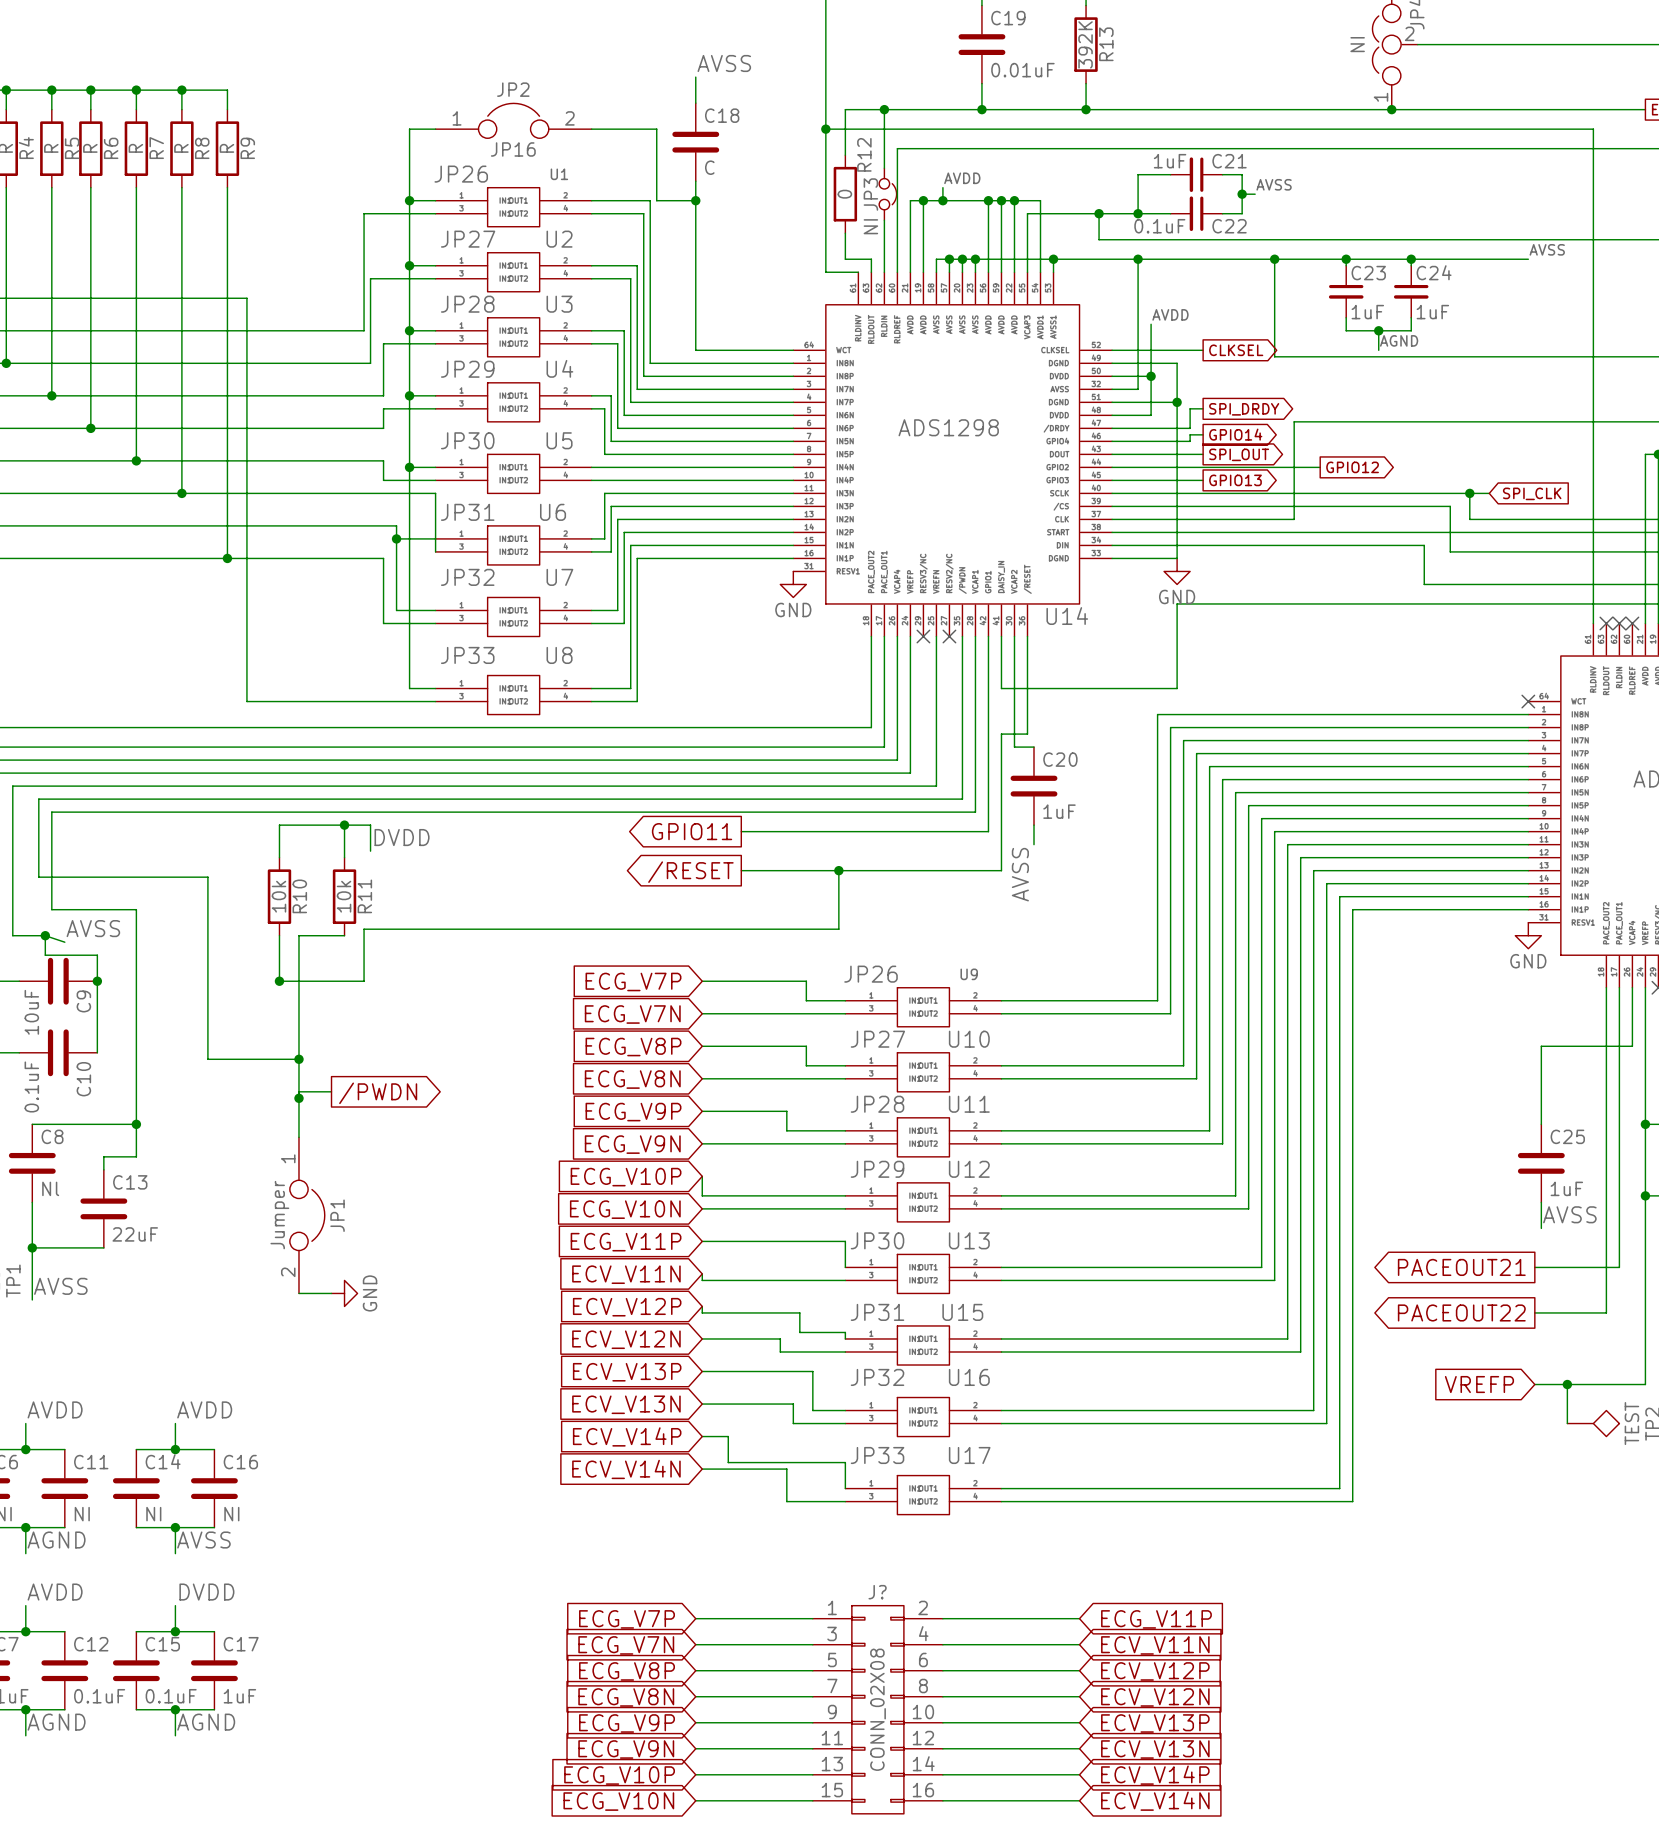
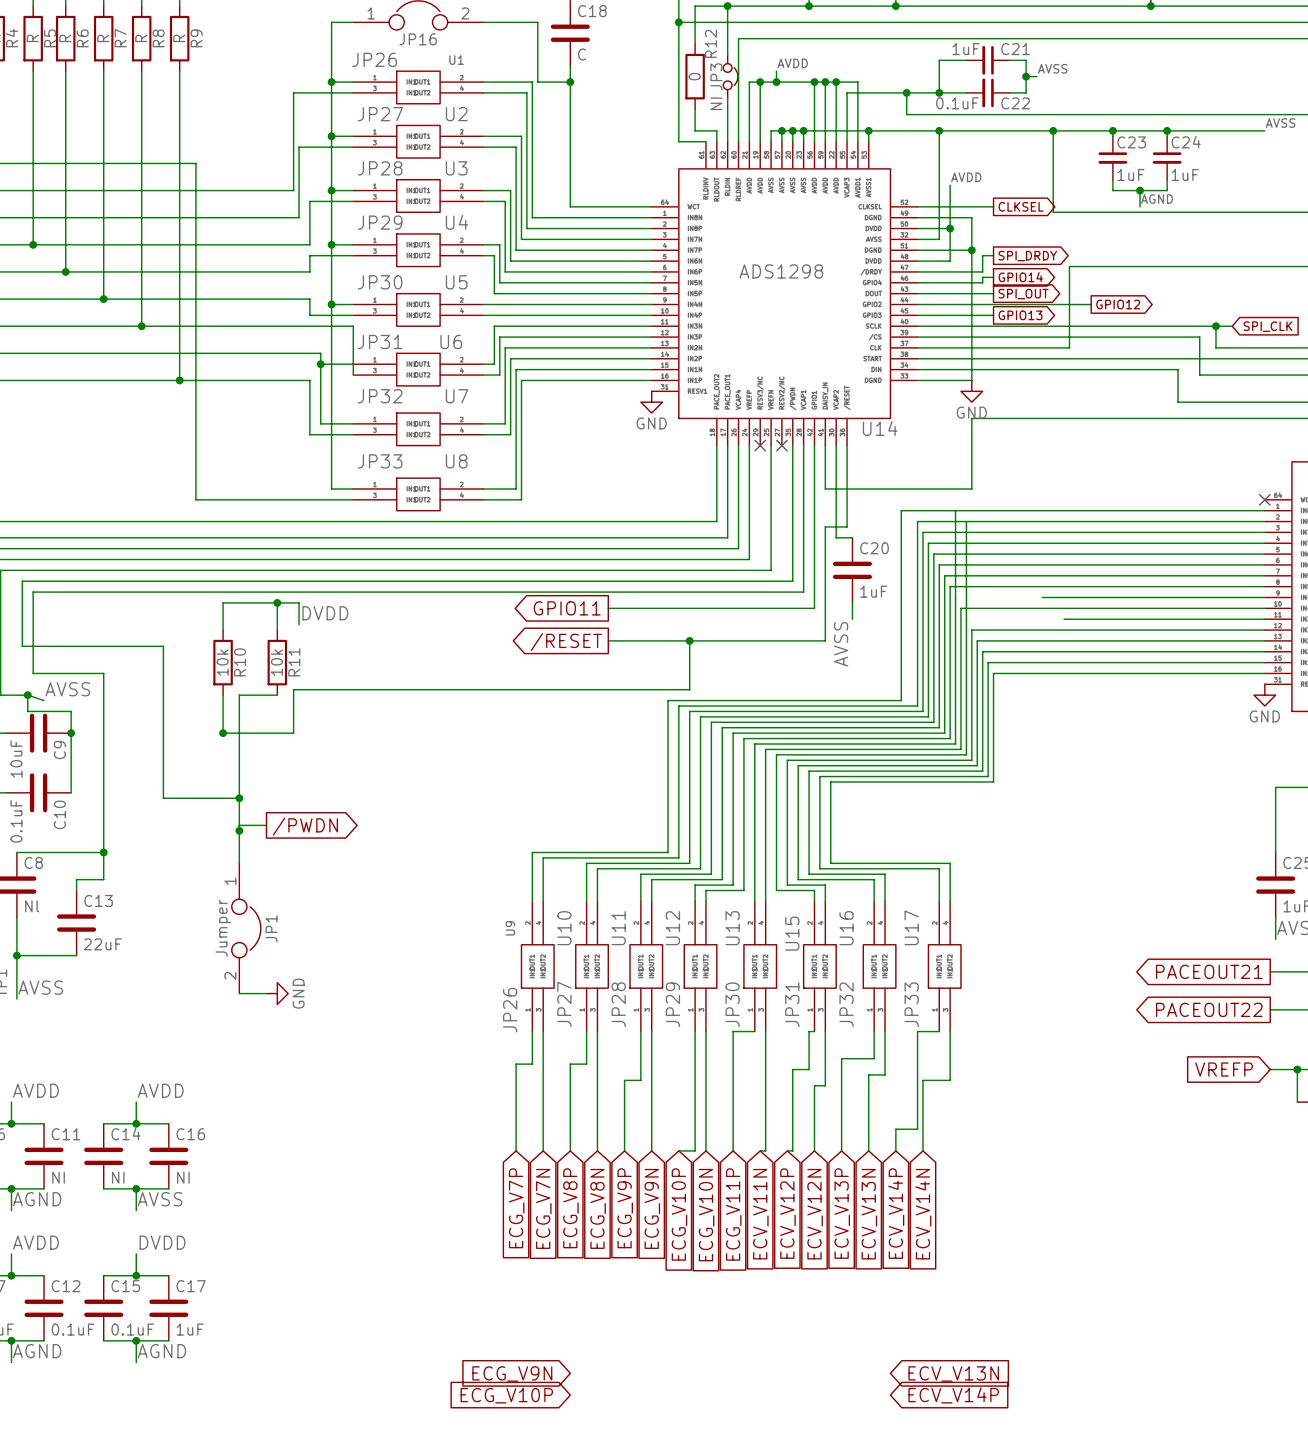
wire: none -> (955, 510) (901, 510) (901, 700) (667, 700) (667, 852) (532, 852) (532, 901)
wire: (1183, 740) (1183, 870) -> (1085, 640) (977, 640)
wire: none -> (977, 532) (922, 532) (922, 711) (689, 711) (689, 863) (586, 863) (586, 901)
wire: (1196, 753) (1196, 896) -> (1107, 662) (988, 662)
wire: none -> (988, 543) (928, 543) (928, 716) (700, 716) (700, 868) (695, 868)
wire: (1209, 766) (1209, 1130) (1001, 1130) -> (998, 554) (933, 554) (933, 722) (711, 722) (711, 874) (640, 874) (640, 901)
wire: (1222, 779) (1222, 1143) (1138, 1143) -> (1009, 564) (939, 564) (939, 727) (722, 727) (722, 879) (651, 879) (651, 901)
wire: (1235, 792) (1235, 1195) (1001, 1195) -> (1020, 575) (944, 575) (944, 733) (733, 733) (733, 885) (695, 885) (695, 901)
wire: (1248, 805) (1248, 1208) (1001, 1208) -> (1031, 586) (950, 586) (950, 738) (743, 738) (743, 890) (705, 890) (705, 901)
wire: (1261, 818) (1261, 1267) (1001, 1267) -> none
wire: (1274, 831) (1274, 1280) (1001, 1280) -> none
wire: (1287, 844) (1287, 1338) (1138, 1338) -> none
wire: (1300, 857) (1300, 1351) (1001, 1351) -> none
wire: (1313, 870) (1313, 1410) (1001, 1410) -> none
wire: (1326, 883) (1326, 1423) (1001, 1423) -> (1096, 651) (982, 651) (982, 771) (809, 771) (809, 874) (885, 874) (885, 901)
wire: (1339, 896) (1339, 1488) (1001, 1488) -> none
wire: (1352, 909) (1352, 1501) (1001, 1501) -> (1118, 673) (993, 673) (993, 781) (830, 781) (830, 863) (950, 863) (950, 901)
global label: ECG_V7P (633, 981) -> none
wire: (702, 981) (806, 981) (806, 1000) (845, 1000) -> none
wire: (1157, 994) (1157, 1000) -> (1053, 608) (960, 608) (960, 749) (955, 749)
wire: none -> (955, 744) (754, 744) (754, 901)
wire: none -> (825, 749) (765, 749) (765, 901)
U9 rotation: 0° (923, 1007) -> 90° counterclockwise (537, 966)
U9 position: (923, 1007) -> (537, 966)
wire: (1170, 1007) (1170, 1013) -> (1074, 630) (971, 630) (971, 760) (966, 760)
wire: none -> (966, 754) (776, 754) (776, 890) (814, 890) (814, 901)
wire: (702, 1013) (845, 1013) -> none
wire: none -> (825, 760) (787, 760) (787, 885) (825, 885) (825, 901)
global label: ECG_V7N (632, 1014) -> none
wire: (1183, 1020) (1183, 1065) (1001, 1065) -> (977, 765) (798, 765) (798, 879) (874, 879) (874, 901)
wire: (1196, 1033) (1196, 1078) (1001, 1078) -> (988, 776) (819, 776) (819, 868) (825, 868)
wire: (702, 1046) (806, 1046) (806, 1065) (845, 1065) -> none
global label: ECG_V8P (633, 1047) -> none
U10 rotation: 0° (923, 1072) -> 90° counterclockwise (592, 966)
U10 position: (923, 1072) -> (592, 966)
wire: (702, 1078) (845, 1078) -> none
global label: ECG_V8N (632, 1079) -> none
wire: (702, 1111) (786, 1111) (786, 1130) -> (543, 901) (543, 857) (646, 857)
global label: ECG_V9P (633, 1112) -> none
wire: (825, 1130) (845, 1130) -> (678, 857) (678, 706) (917, 706) (917, 521) (966, 521)
U11 rotation: 0° (923, 1137) -> 90° counterclockwise (646, 966)
U11 position: (923, 1137) -> (646, 966)
wire: (702, 1143) (728, 1143) -> (597, 901) (597, 868)
wire: none -> (939, 868) (939, 901)
global label: ECG_V9N (632, 1144) -> none
wire: (702, 1176) (702, 1195) (845, 1195) -> none
global label: ECG_V10P (626, 1177) -> none
U12 rotation: 0° (923, 1202) -> 90° counterclockwise (700, 966)
wire: (702, 1208) (845, 1208) -> none
global label: ECG_V10N (625, 1209) -> none
wire: (702, 1241) (845, 1241) (845, 1267) -> none
global label: ECG_V11P (626, 1242) -> none
wire: (702, 1273) (702, 1280) (845, 1280) -> none
U13 rotation: 0° (923, 1273) -> 90° counterclockwise (760, 966)
global label: ECV_V11N (626, 1274) -> none
wire: (702, 1306) (702, 1312) (799, 1312) (799, 1332) (845, 1332) (845, 1338) -> (695, 1134) (695, 1031)
global label: ECV_V12P (627, 1307) -> none
wire: none -> (532, 1031) (532, 1064) (516, 1064) (516, 1150)
wire: none -> (543, 1031) (543, 1150)
wire: (702, 1338) (780, 1338) -> none
wire: none -> (586, 1031) (586, 1064) (570, 1064) (570, 1150)
wire: none -> (705, 1031) (705, 1150)
wire: none -> (754, 1031) (733, 1031) (733, 1150)
wire: none -> (765, 1031) (765, 1150) (760, 1150)
wire: none -> (814, 1031) (809, 1031) (809, 1069) (792, 1069) (792, 1150) (787, 1150)
wire: (1001, 1338) (1112, 1338) -> (895, 1150) (895, 1129) (917, 1129) (917, 1031)
wire: none -> (825, 1031) (825, 1085) (814, 1085) (814, 1150)
wire: none -> (874, 1031) (874, 1058) (841, 1058) (841, 1150)
wire: none -> (885, 1031) (885, 1074) (868, 1074) (868, 1150)
wire: none -> (950, 1031) (950, 1080) (922, 1080) (922, 1150)
global label: ECV_V12N (626, 1339) -> none
U15 rotation: 0° (923, 1345) -> 90° counterclockwise (819, 966)
U15 position: (923, 1345) -> (819, 966)
wire: (780, 1351) (845, 1351) -> (640, 1042) (640, 1080) (624, 1080) (624, 1150)
wire: (702, 1371) (812, 1371) (812, 1410) (845, 1410) -> none
global label: ECV_V13P (627, 1372) -> none
global label: ECV_V13N (626, 1404) -> none
wire: (702, 1404) (793, 1404) -> (651, 1031) (651, 1085)
U16 rotation: 0° (923, 1417) -> 90° counterclockwise (879, 966)
U16 position: (923, 1417) -> (879, 966)
wire: (793, 1423) (845, 1423) -> (651, 1102) (651, 1150)
global label: ECV_V14P (627, 1436) -> none
wire: (702, 1436) (728, 1436) -> (597, 1031) (597, 1112)
wire: (728, 1462) (845, 1462) -> (597, 1134) (597, 1150)
global label: ECV_V14N (626, 1469) -> none
wire: (702, 1469) (786, 1469) (786, 1501) (845, 1501) -> none
wire: (845, 1482) (845, 1488) -> (695, 1150) (678, 1150)
U17 rotation: 0° (923, 1495) -> 90° counterclockwise (944, 966)
U17 position: (923, 1495) -> (944, 966)
global label: none -> ECG_V9P (625, 1208)
global label: none -> ECG_V8N (598, 1208)
global label: none -> ECG_V9N (652, 1208)
global label: none -> ECV_V11N (760, 1214)
global label: none -> ECV_V12P (787, 1213)
global label: none -> ECV_V12N (815, 1214)
global label: none -> ECV_V13P (842, 1213)
global label: none -> ECV_V13N (869, 1214)
global label: none -> ECV_V14P (896, 1213)
global label: none -> ECV_V14N (923, 1214)
global label: none -> ECG_V10P (679, 1214)
global label: none -> ECG_V11P (733, 1214)
global label: none -> ECG_V10N (706, 1215)
wire: (695, 1618) (812, 1618) -> none
wire: (942, 1618) (1079, 1618) -> none
global label rotation: 0° (626, 1619) -> 90° counterclockwise (516, 1208)
global label: ECG_V11P (1156, 1619) -> none
wire: (695, 1644) (812, 1644) -> none
wire: (942, 1644) (1079, 1644) -> none
global label rotation: 0° (626, 1645) -> 90° counterclockwise (543, 1208)
global label: ECV_V11N (1155, 1645) -> none
wire: (695, 1670) (812, 1670) -> none
wire: (942, 1670) (1079, 1670) -> none
global label rotation: 0° (626, 1671) -> 90° counterclockwise (570, 1208)
global label: ECV_V12P (1155, 1671) -> none
wire: (695, 1696) (812, 1696) -> none
wire: (942, 1696) (1079, 1696) -> none
global label: ECG_V8N (626, 1697) -> none
global label: ECV_V12N (1155, 1697) -> none
J?: CONN_02X08 (877, 1709) -> none
wire: (695, 1722) (812, 1722) -> none
wire: (942, 1722) (1079, 1722) -> none
global label: ECG_V9P (626, 1723) -> none
global label: ECV_V13P (1155, 1723) -> none
wire: (695, 1748) (812, 1748) -> none
wire: (942, 1748) (1079, 1748) -> none
wire: (695, 1774) (812, 1774) -> none
wire: (942, 1774) (1079, 1774) -> none
wire: (695, 1800) (812, 1800) -> none
wire: (942, 1800) (1079, 1800) -> none
global label: ECG_V10N (618, 1801) -> none
global label: ECV_V14N (1155, 1801) -> none

